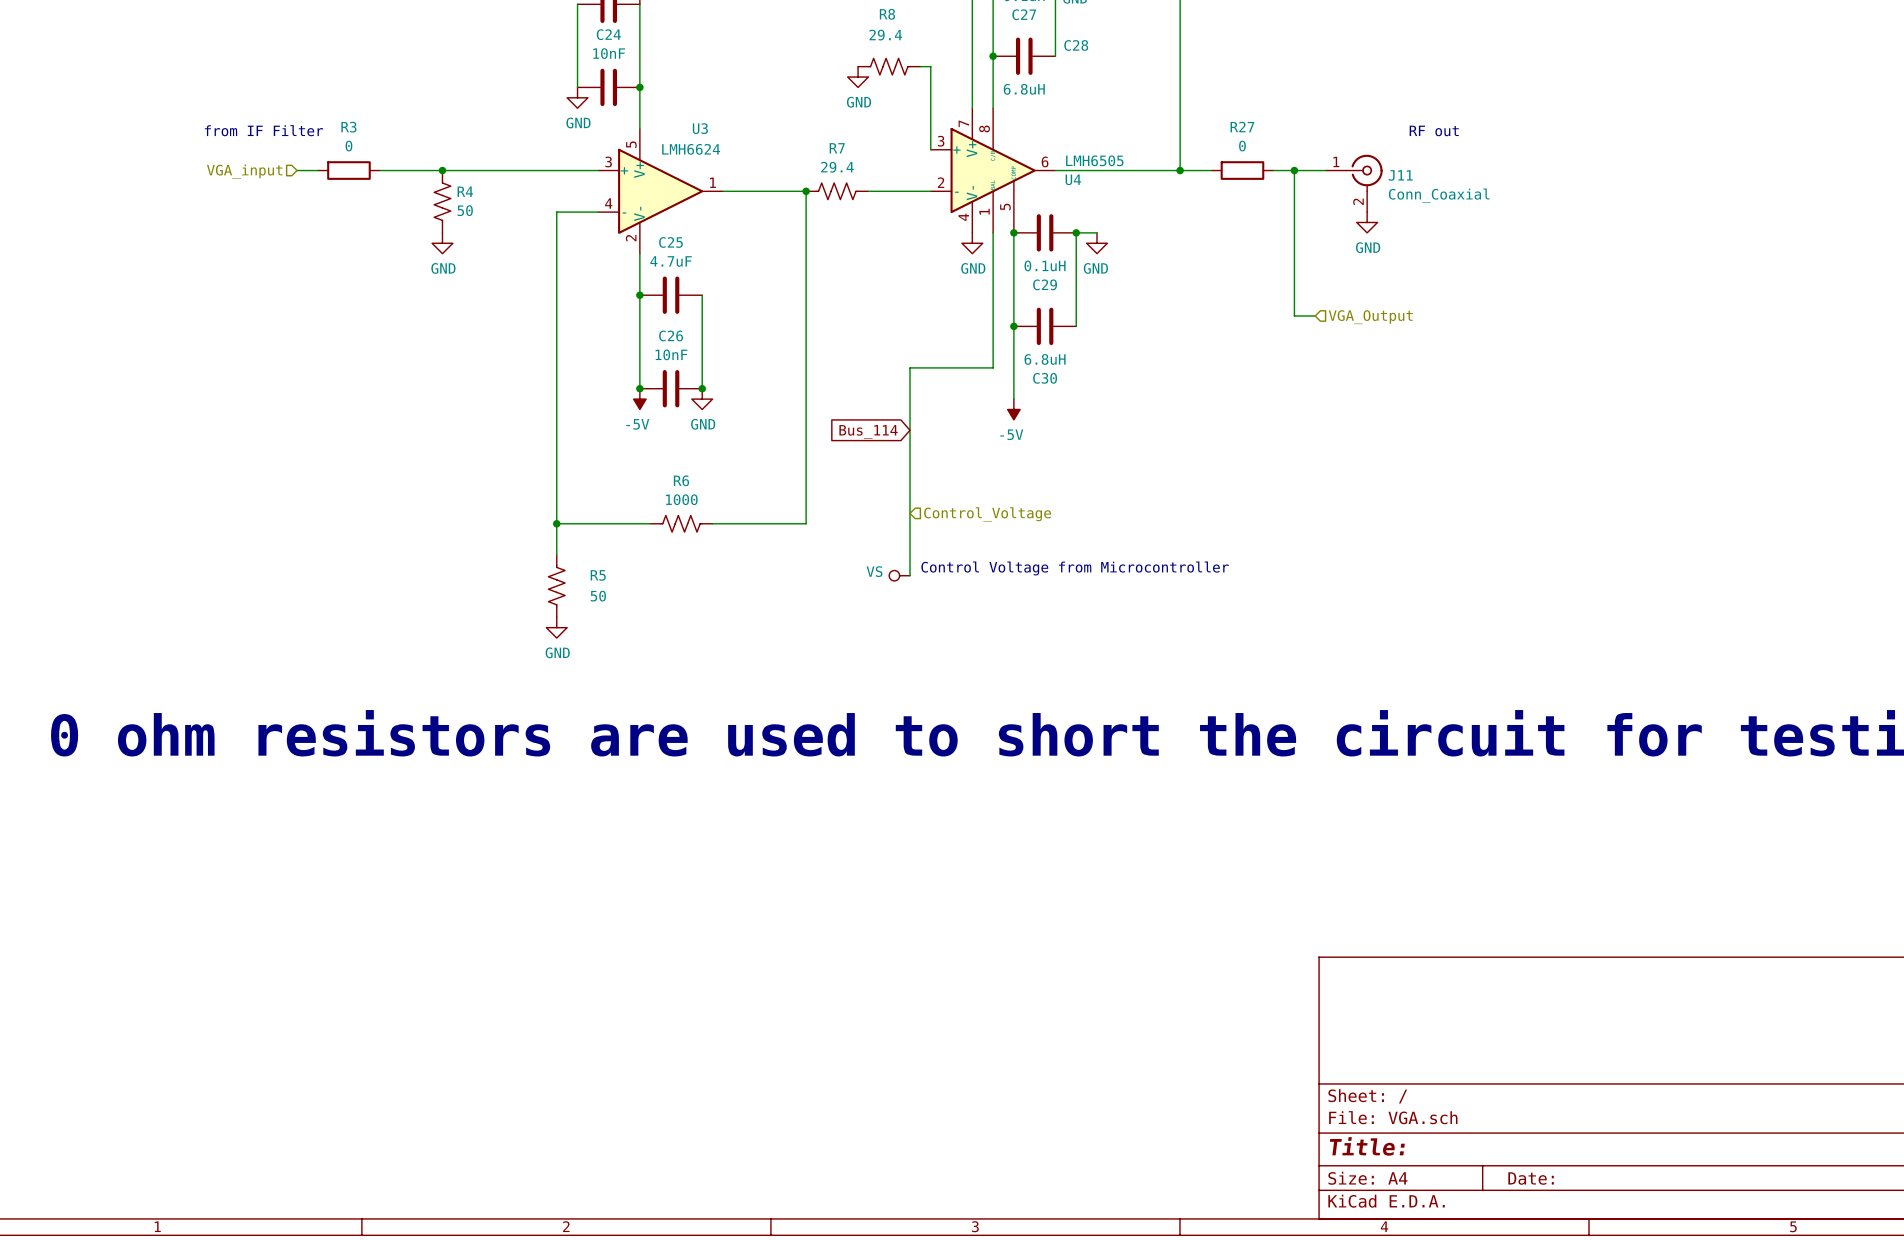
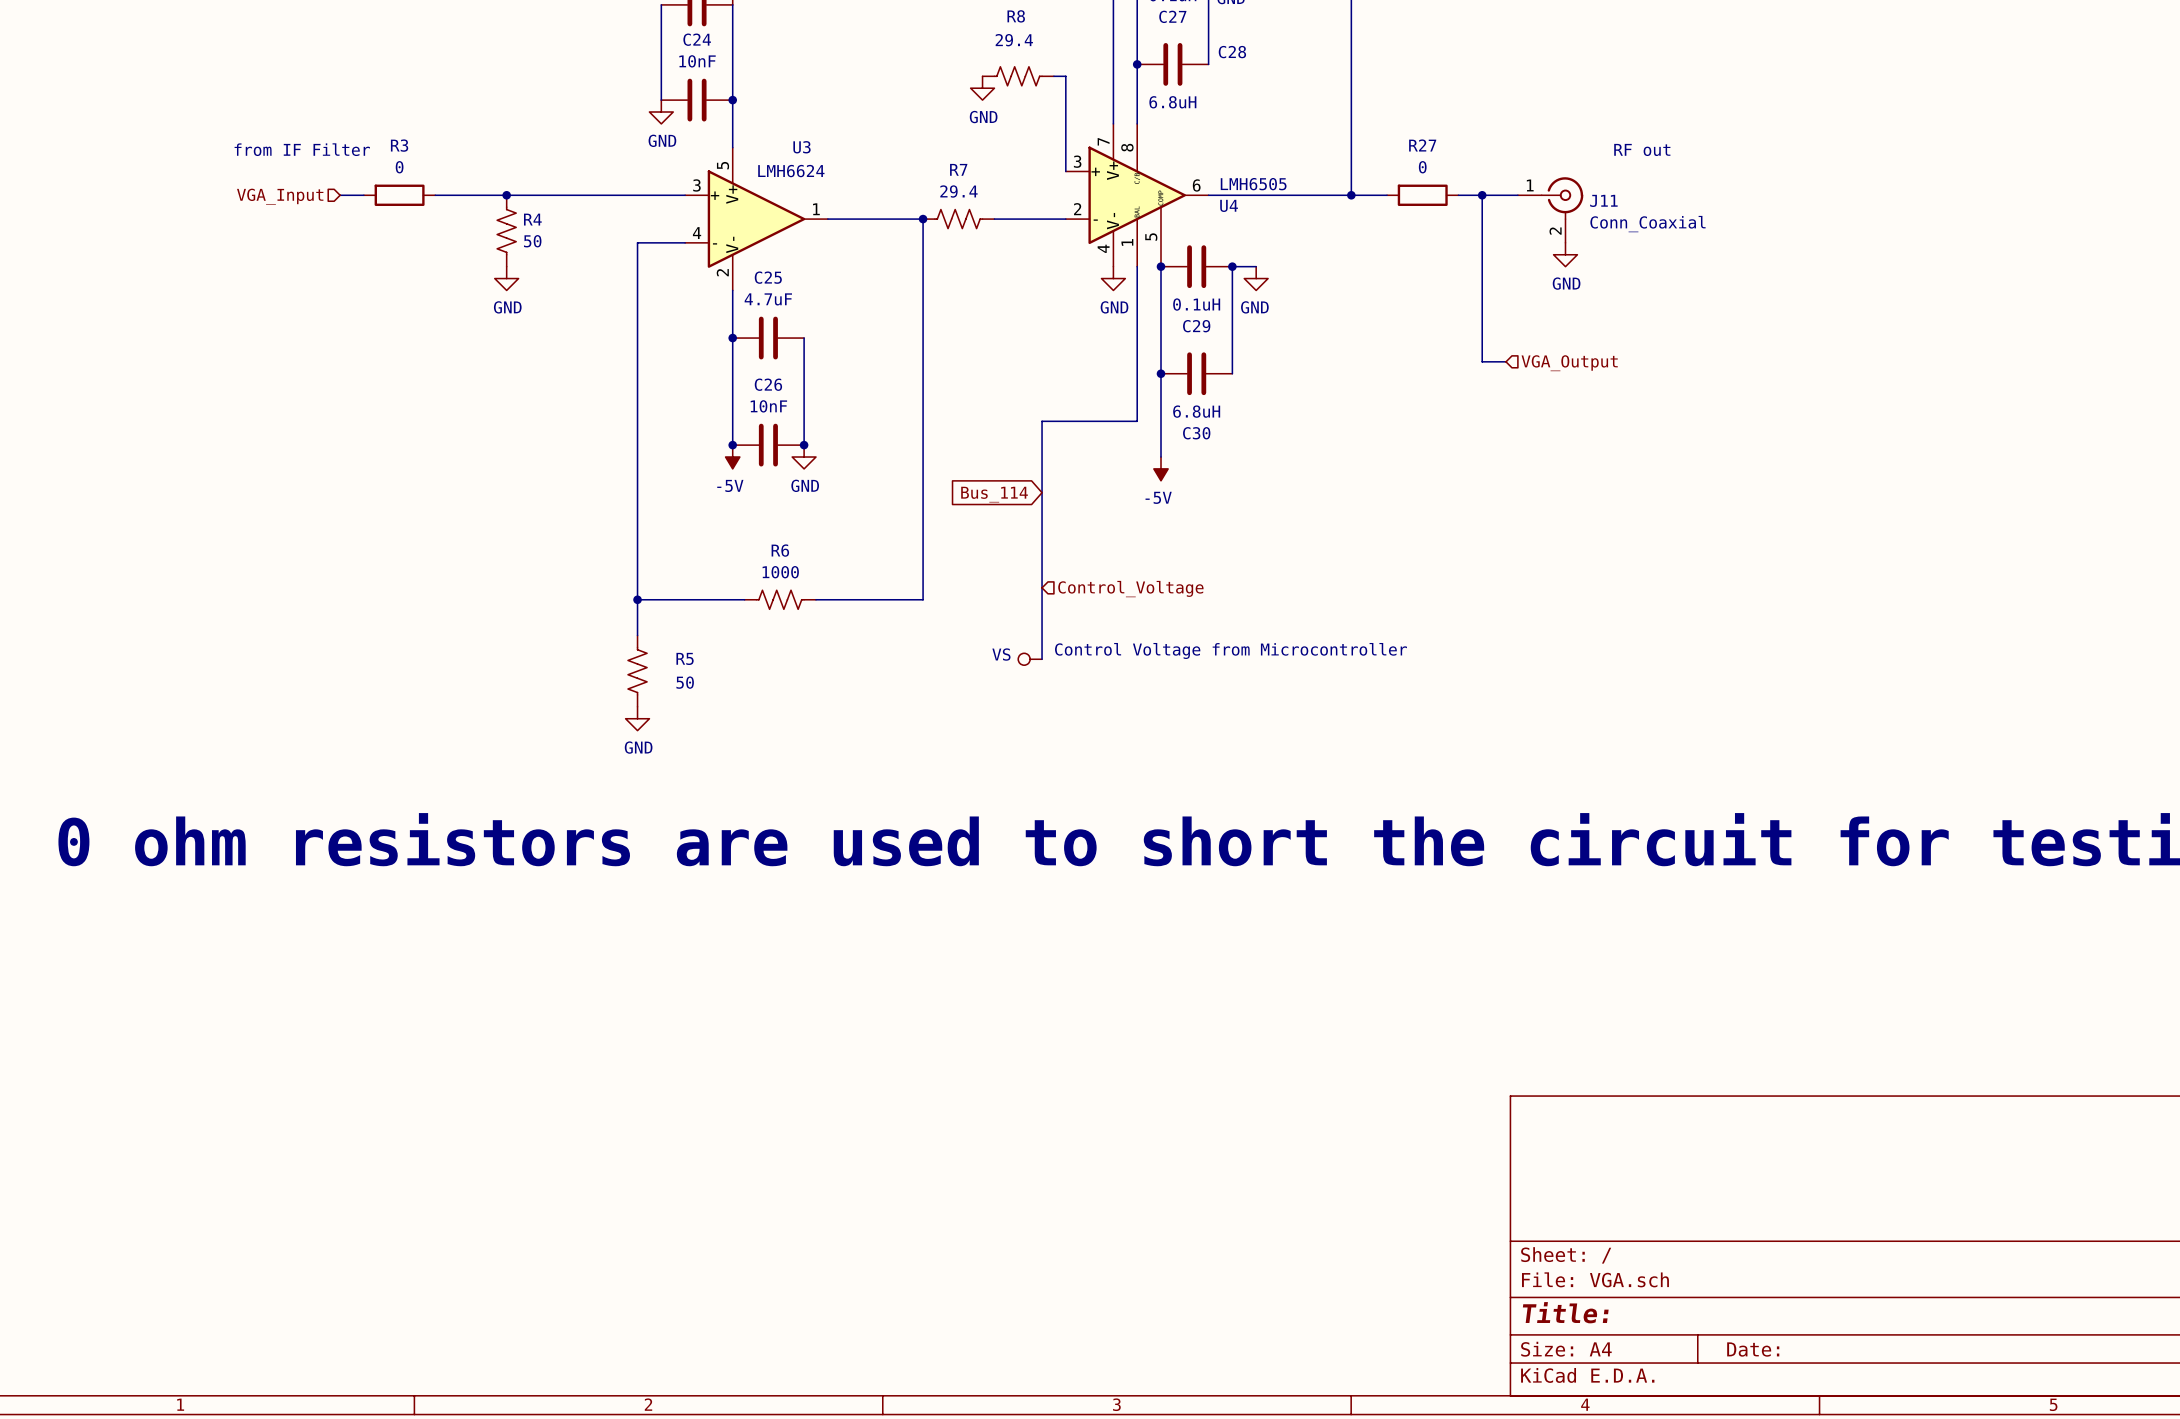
hierarchical label: VGA_input (244, 171) -> VGA_Input (280, 196)

